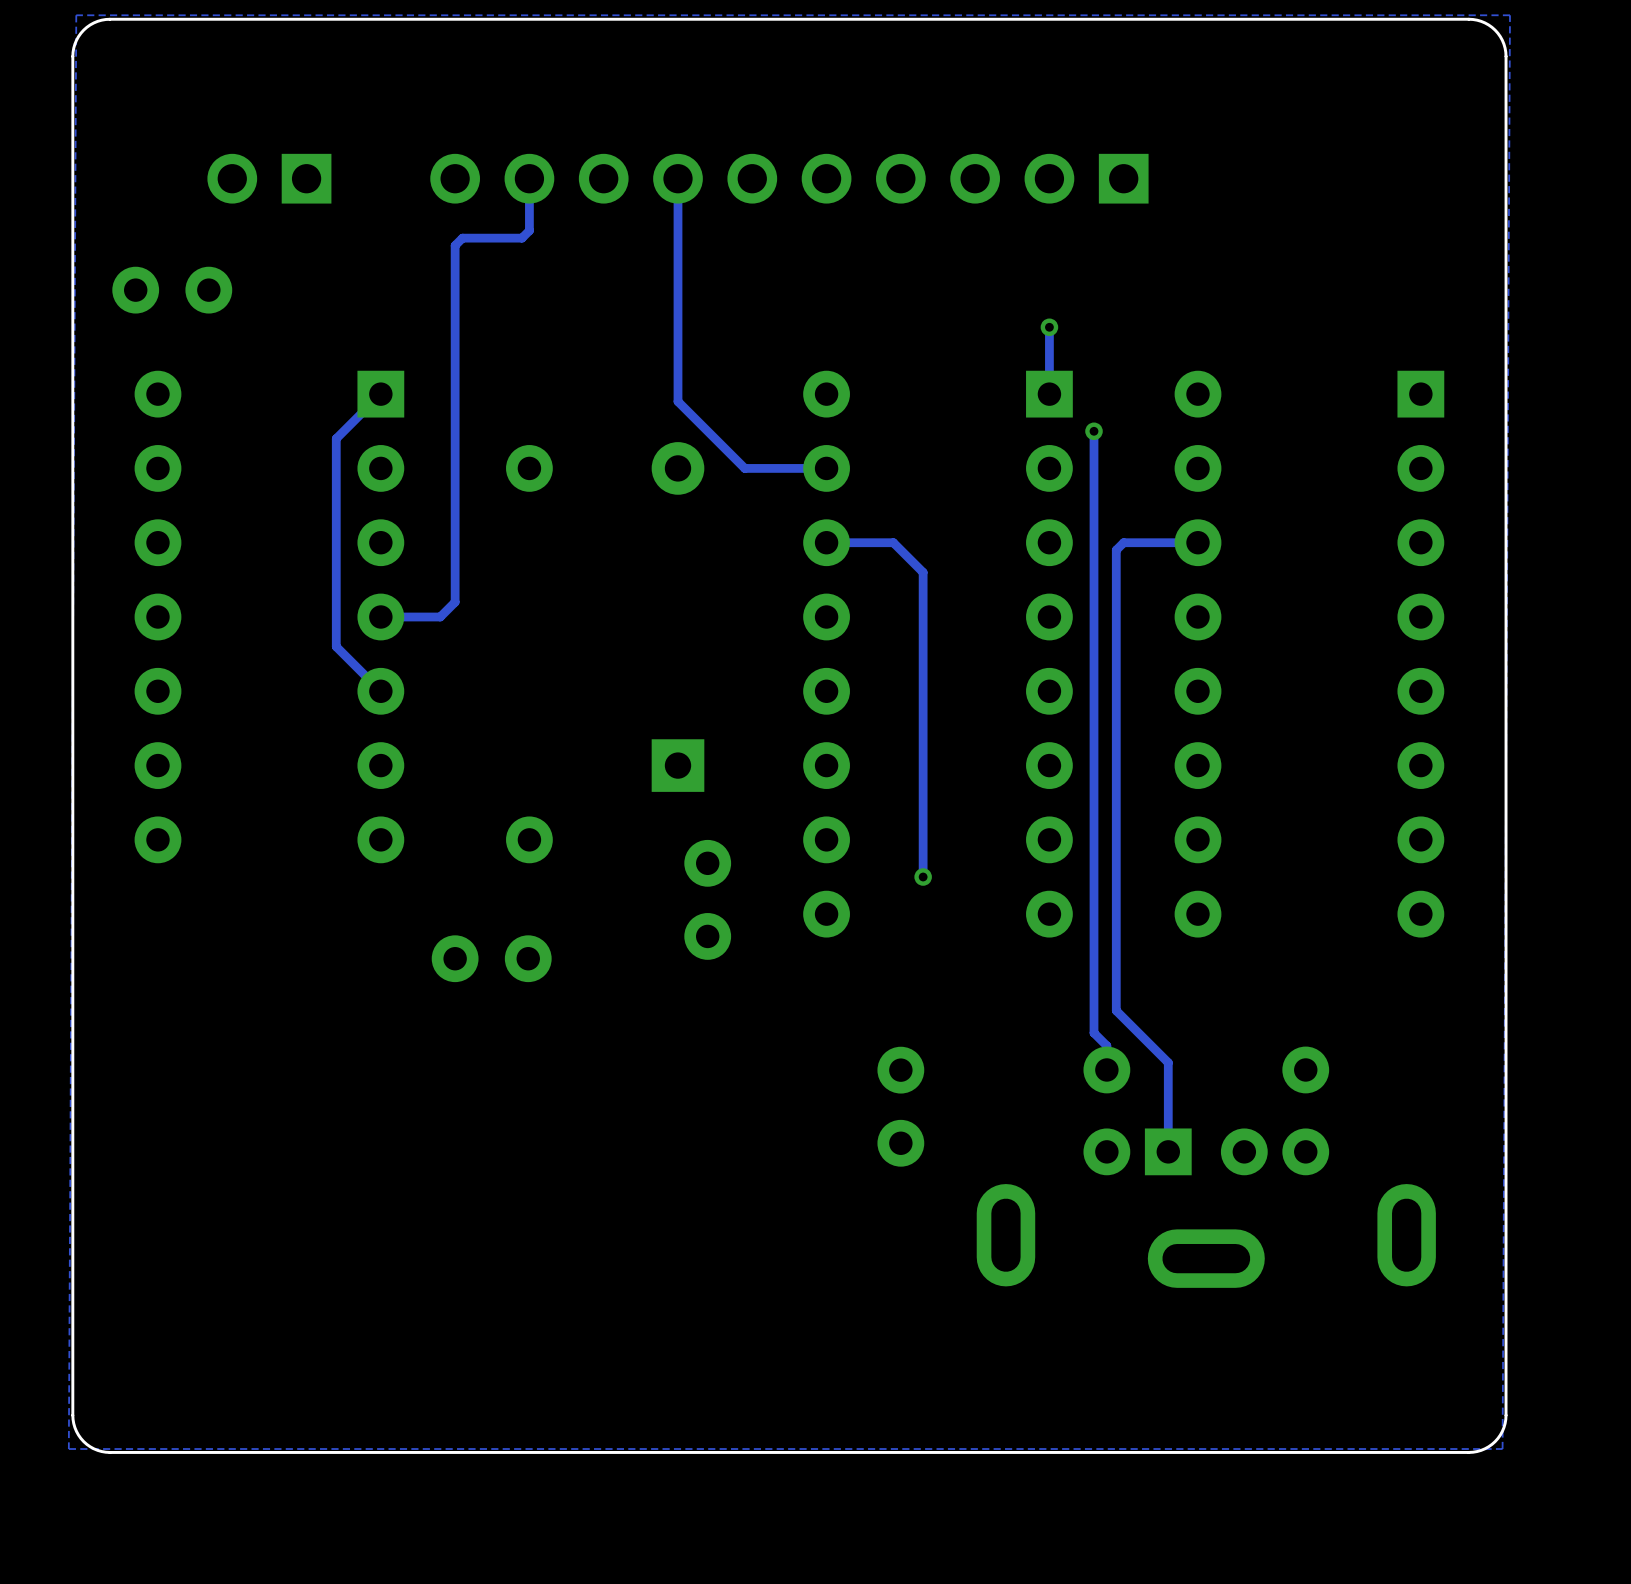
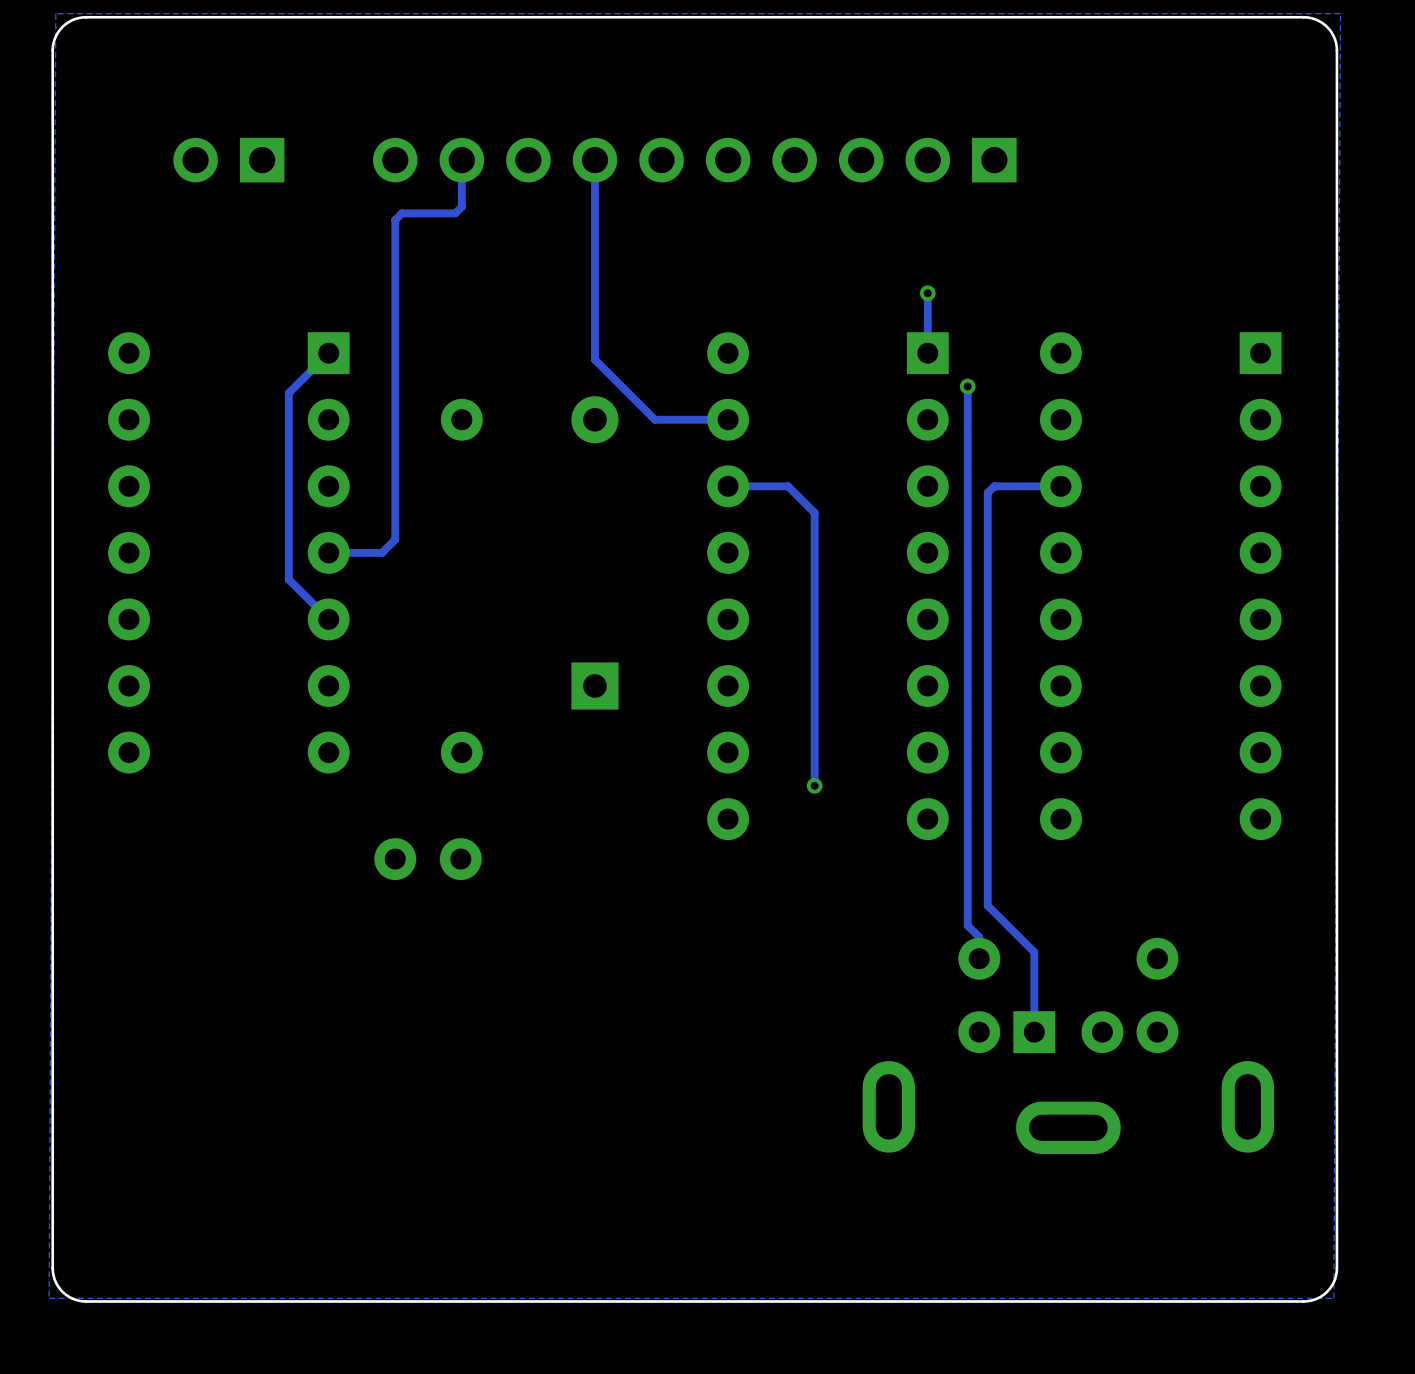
part: (172, 290) -> none
part: (707, 899) -> none
part: (900, 1106) -> none

